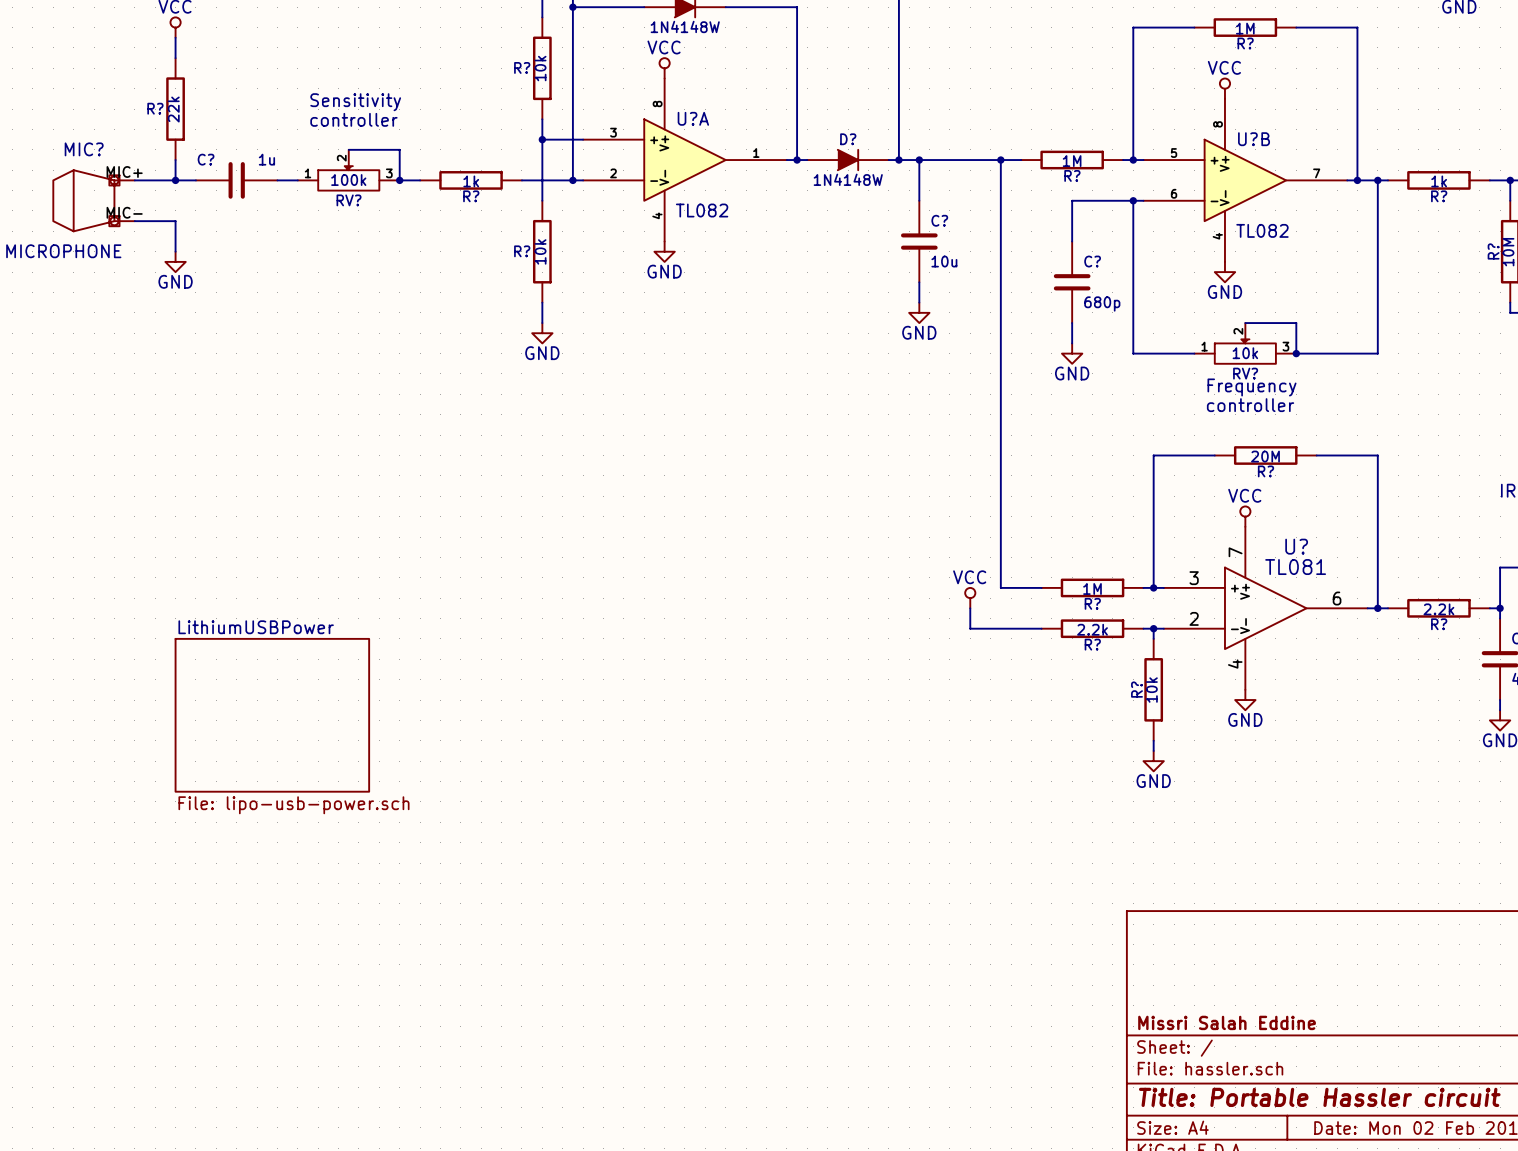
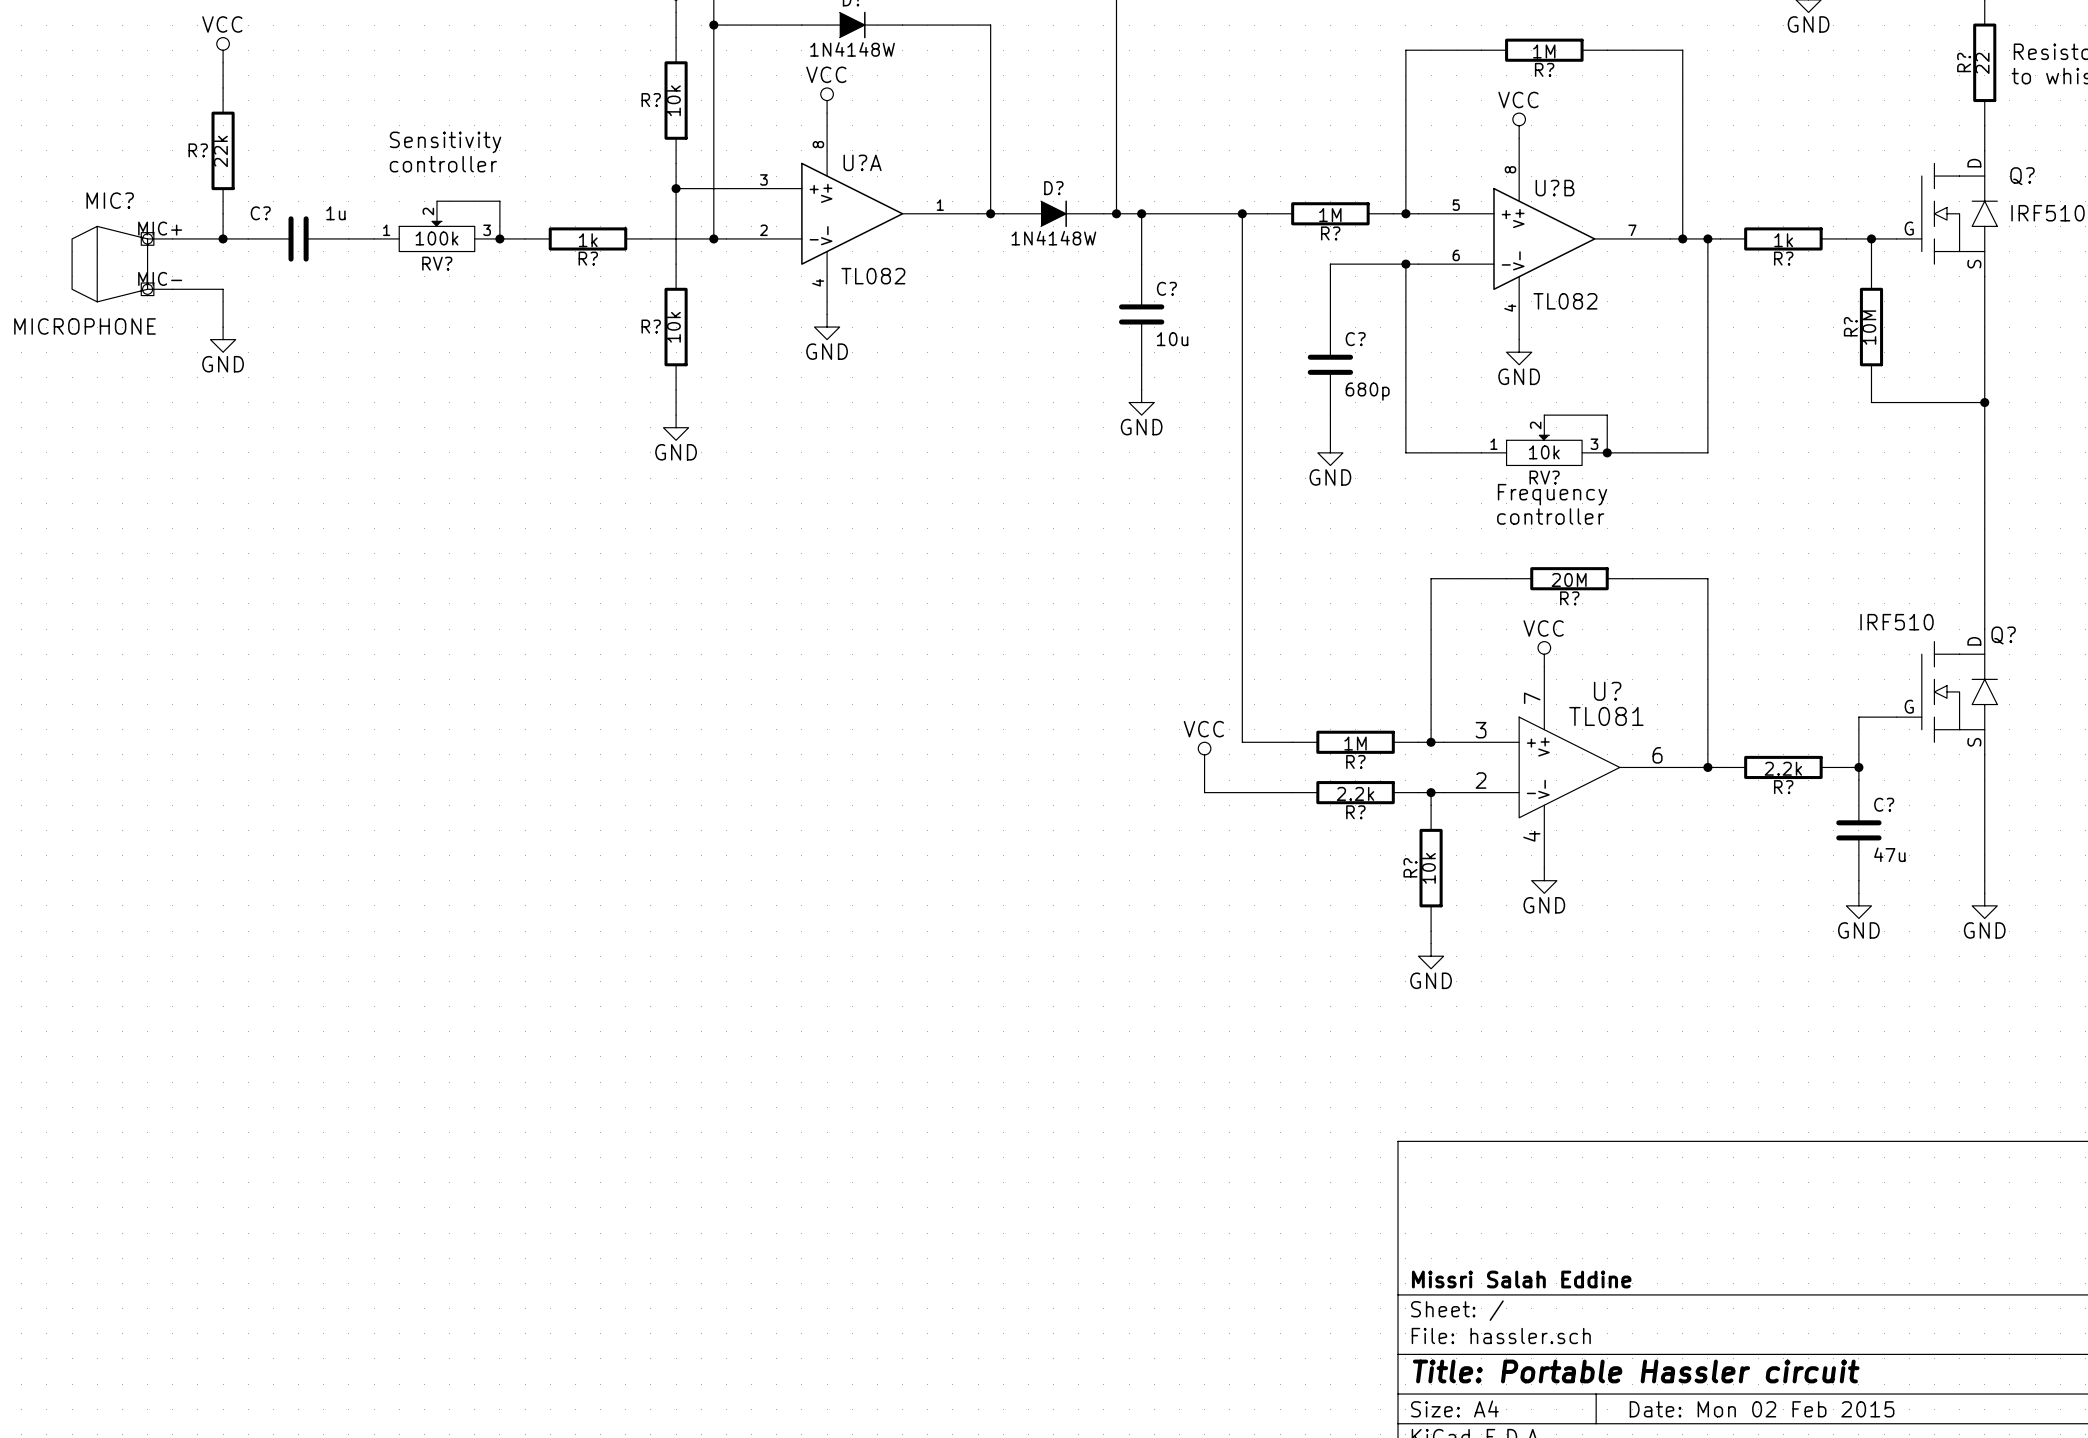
sheet LithiumUSBPower: File: lipo-usb-power.sch (272, 715) -> none

